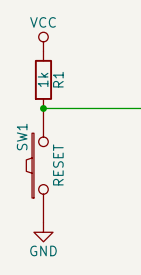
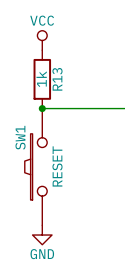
R1 name: R1 (58, 79) -> R13 (57, 79)

